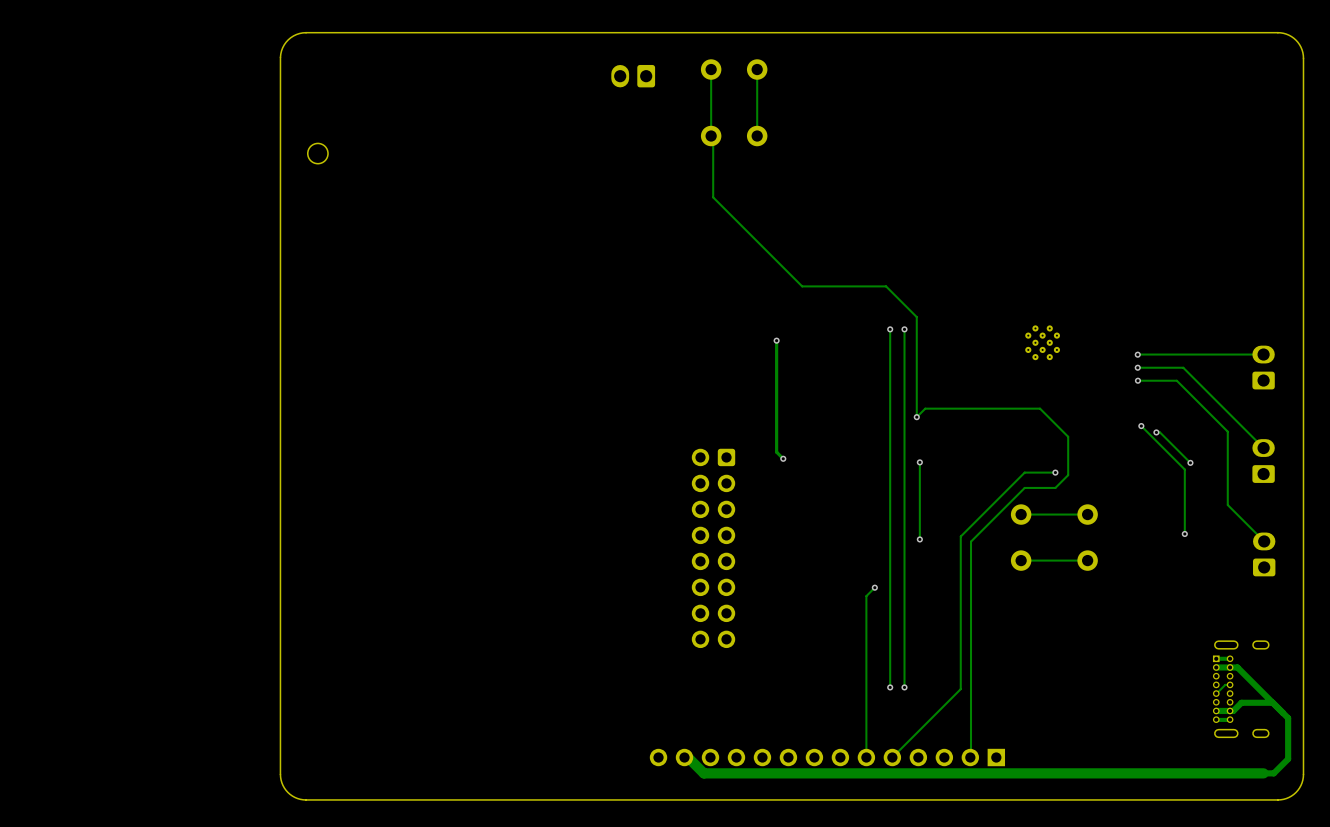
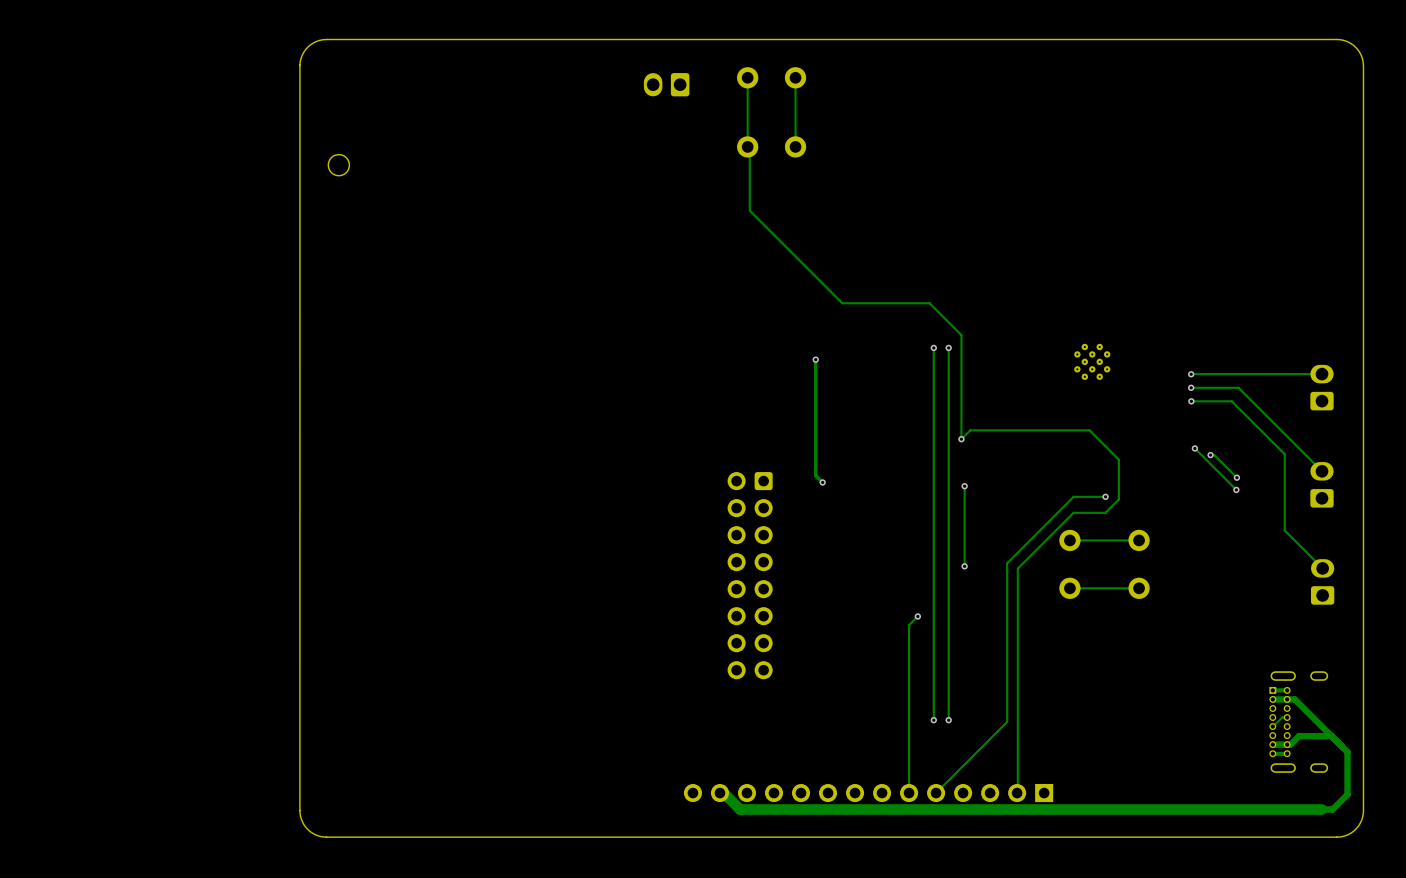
track: (1181, 454) (1190, 462) -> none
via: none -> (1236, 477)
via: (1190, 462) -> none
track: (1181, 465) (1184, 469) (1184, 533) -> none
via: none -> (1236, 489)
via: (1184, 533) -> none

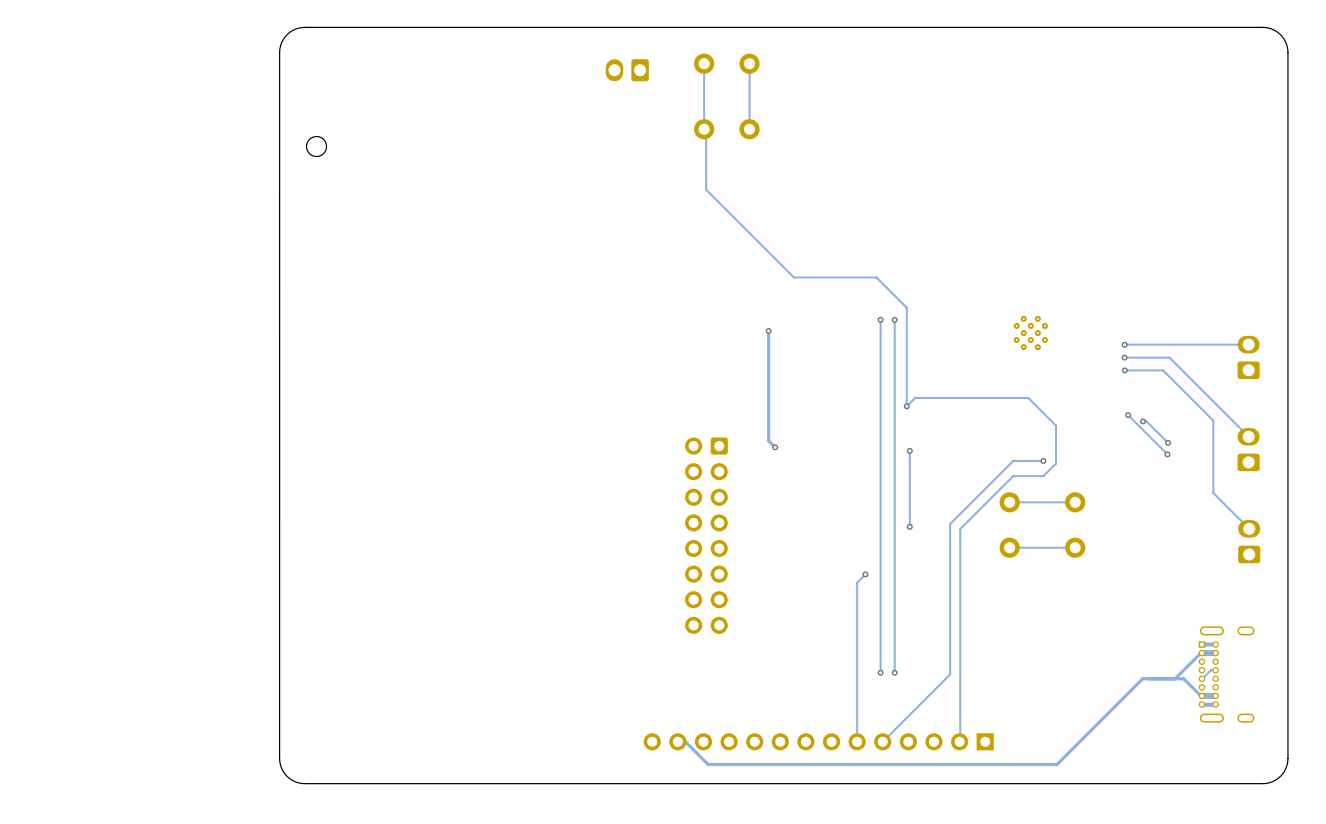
track: none -> (1202, 653) (1175, 678)
track: (1287, 699) (1294, 699) (1347, 752) (1347, 794) (1332, 809) (740, 809) (723, 793) -> (1200, 695) (1201, 695) (1202, 695) (1183, 678) (1142, 678) (1057, 764) (708, 764) (685, 741) (681, 741)
track: (1331, 736) (1299, 736) (1290, 744) (1287, 744) -> none

